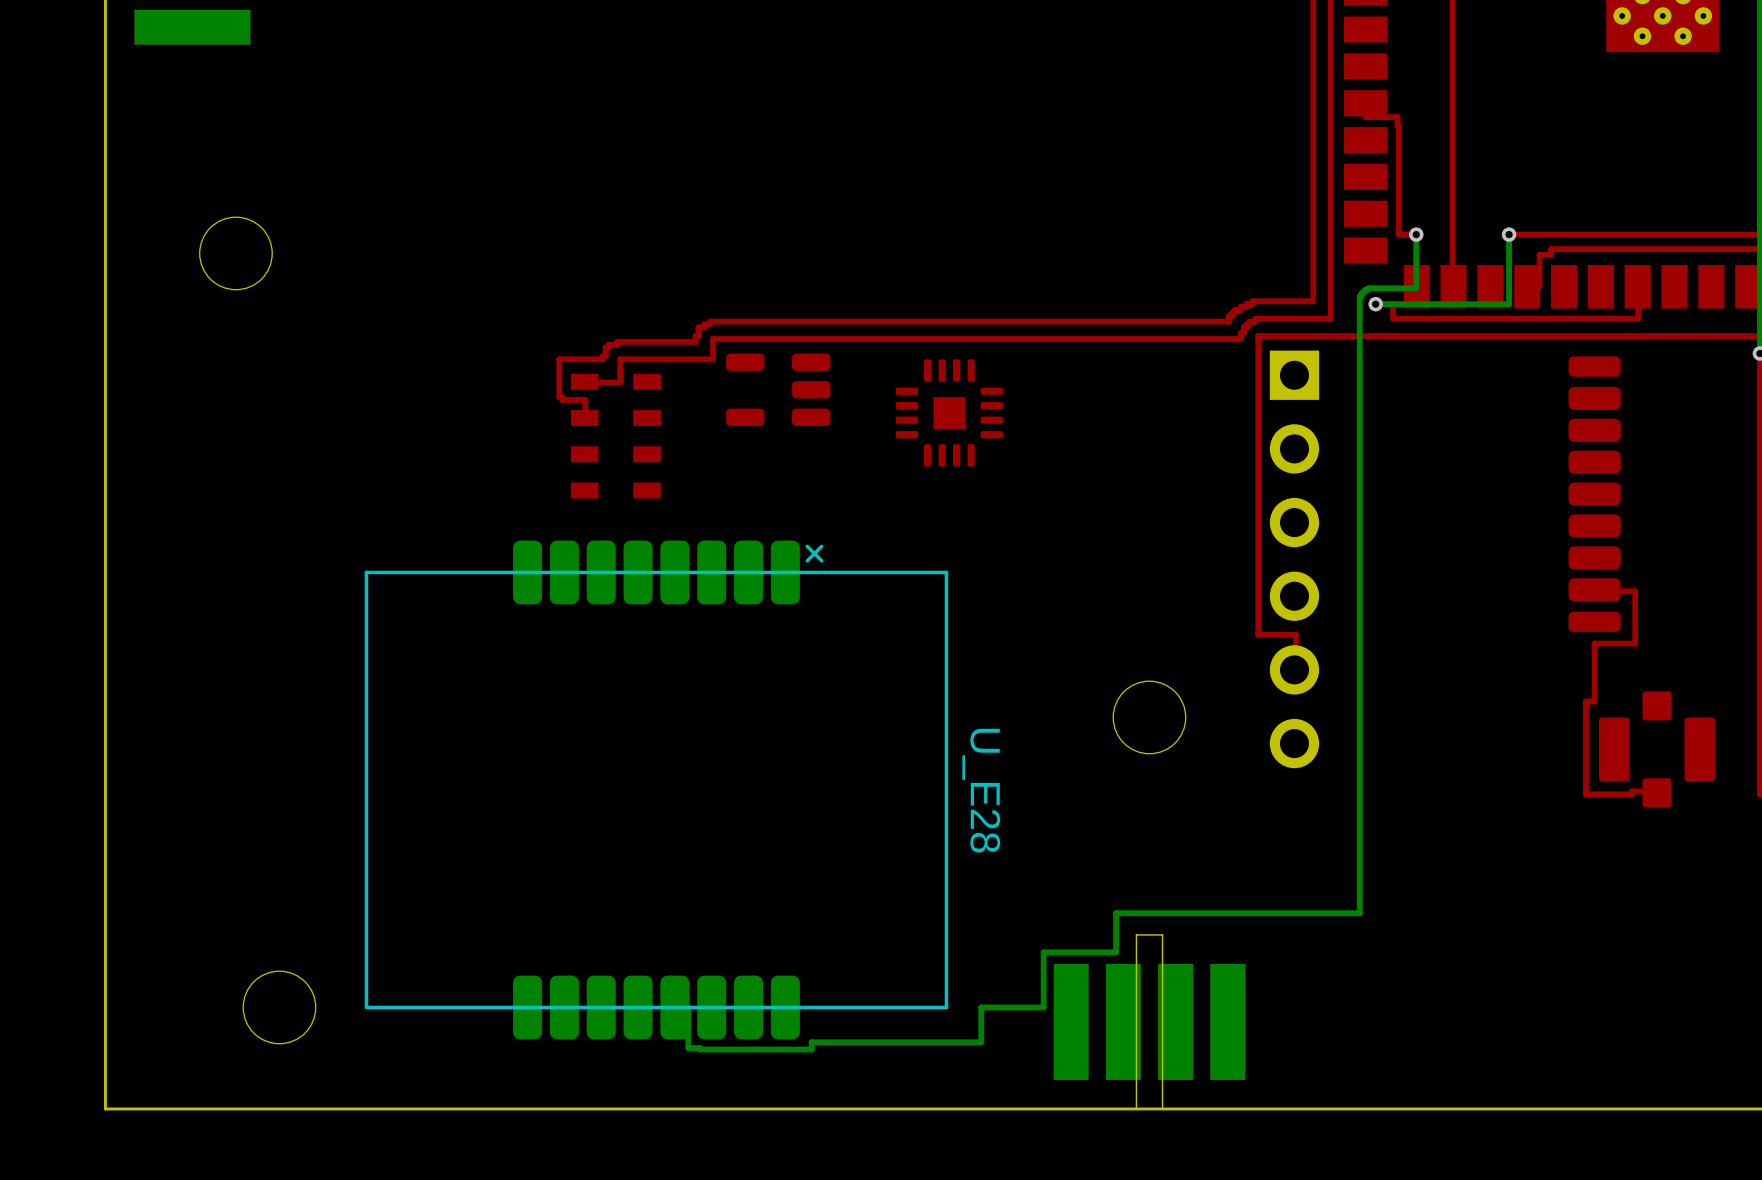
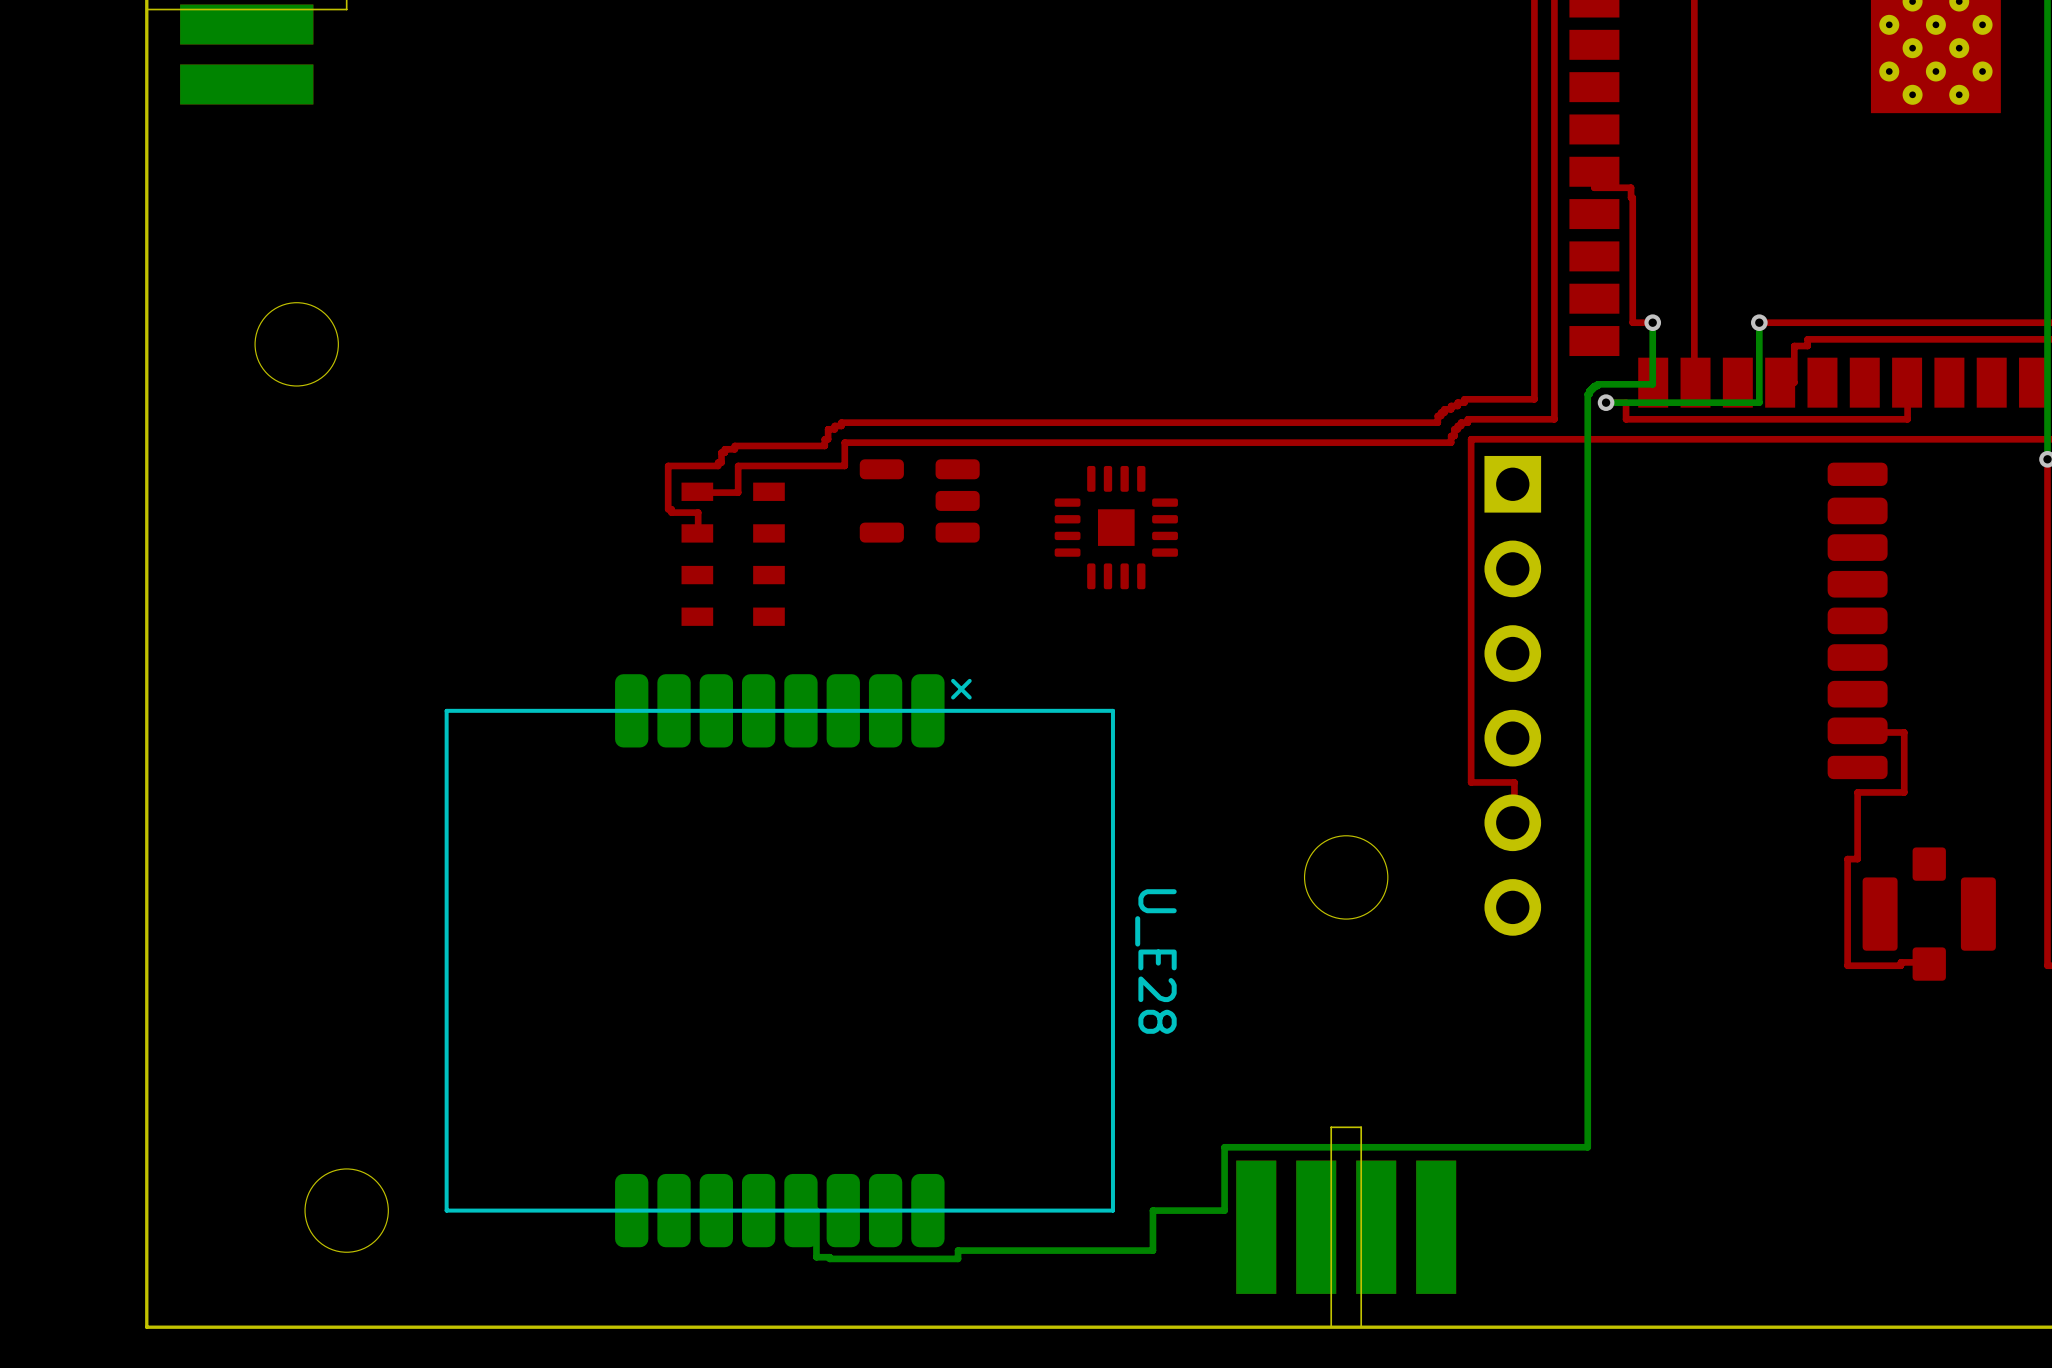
bottom track: (1359, 913) (1116, 913) (1116, 952) -> (1587, 1102) (1587, 1147) (1307, 1147)

